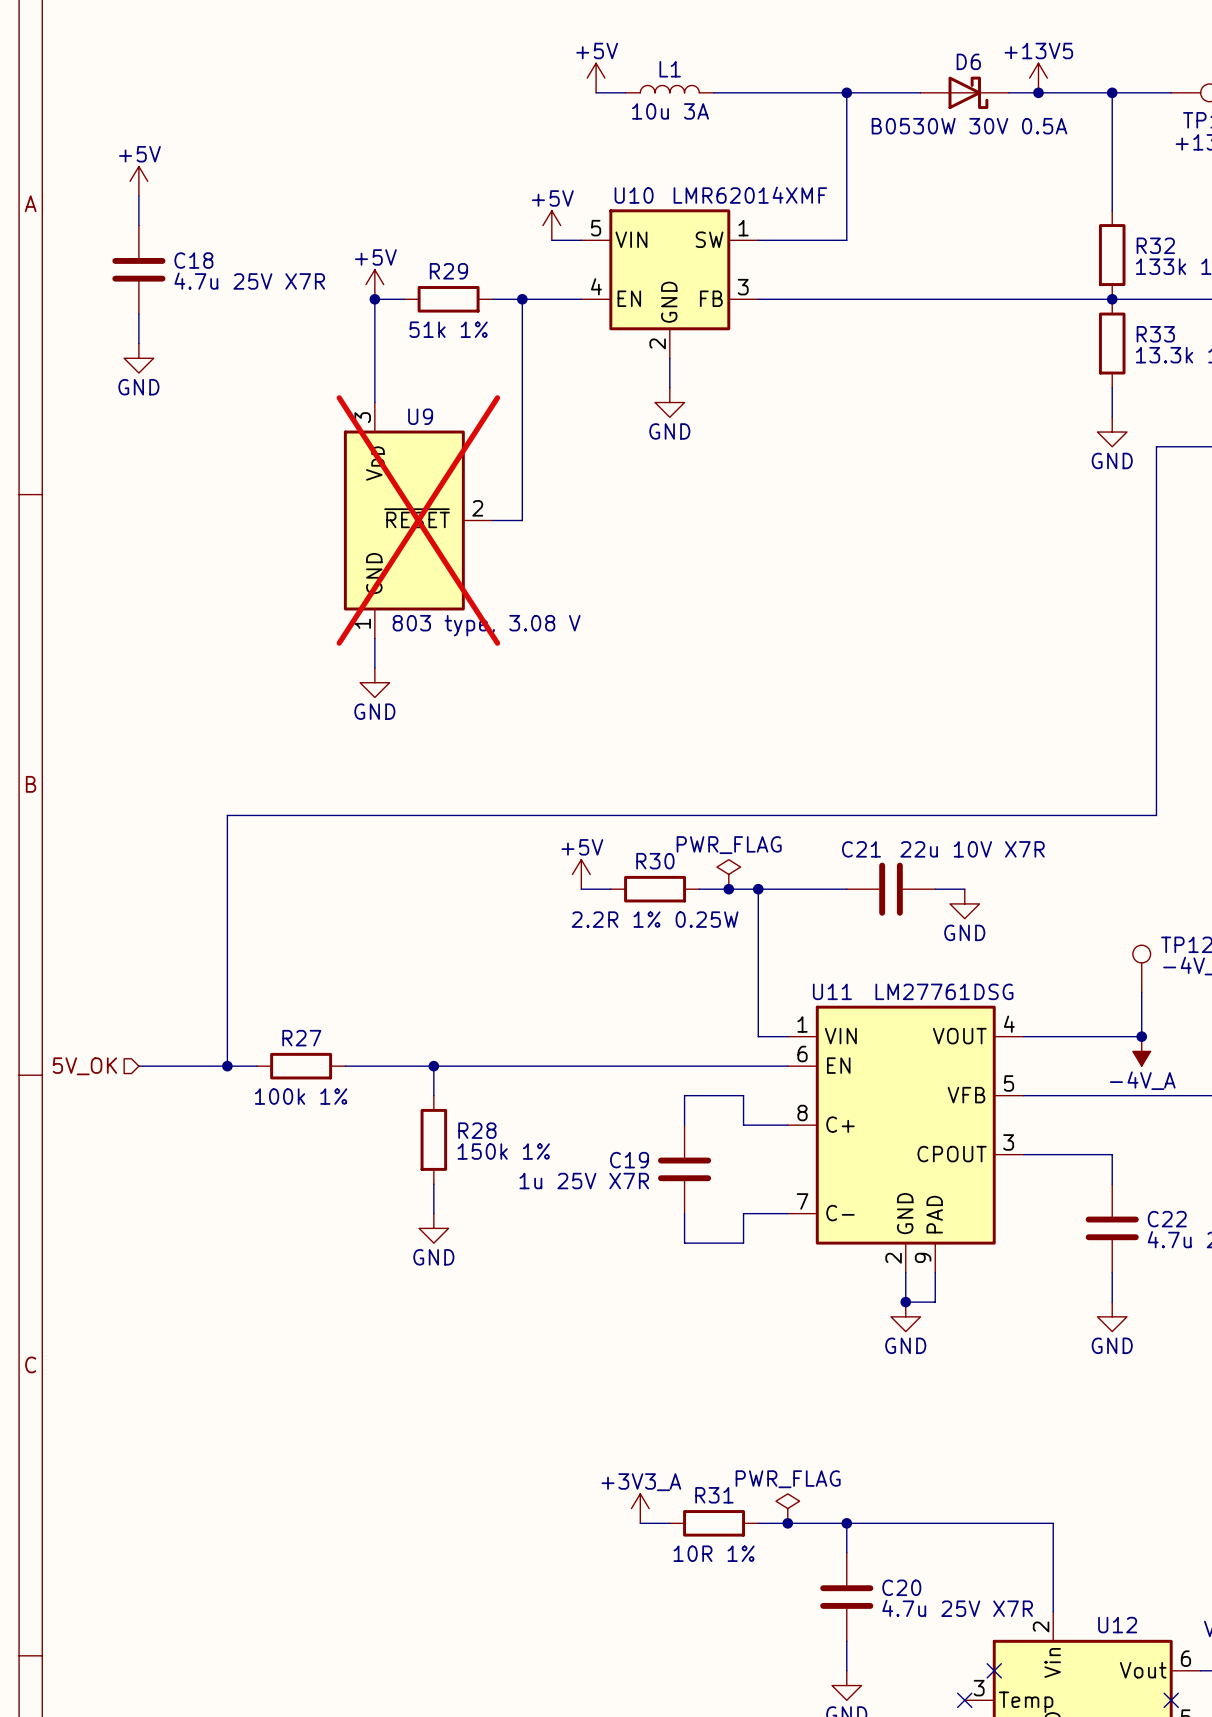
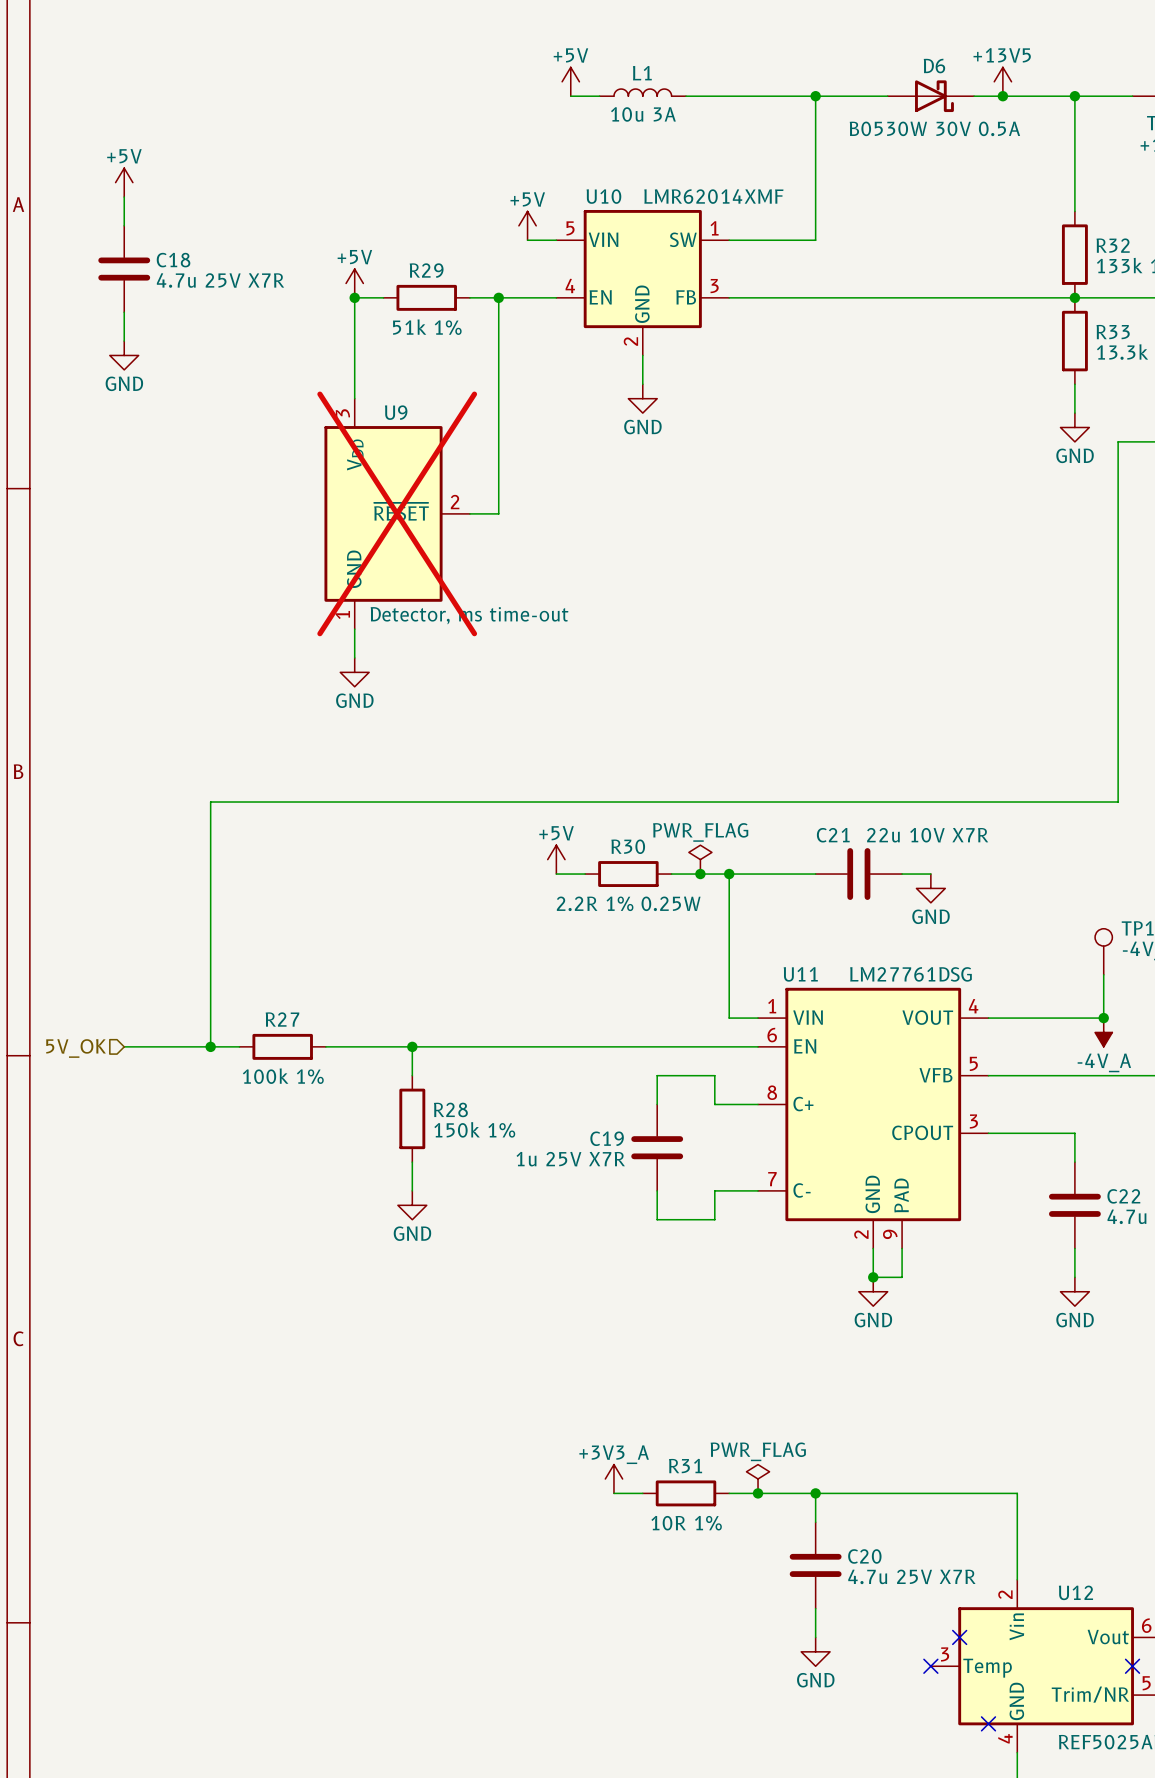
U9 value: 803 type, 3.08 V (486, 625) -> Detector, ms time-out (469, 615)

